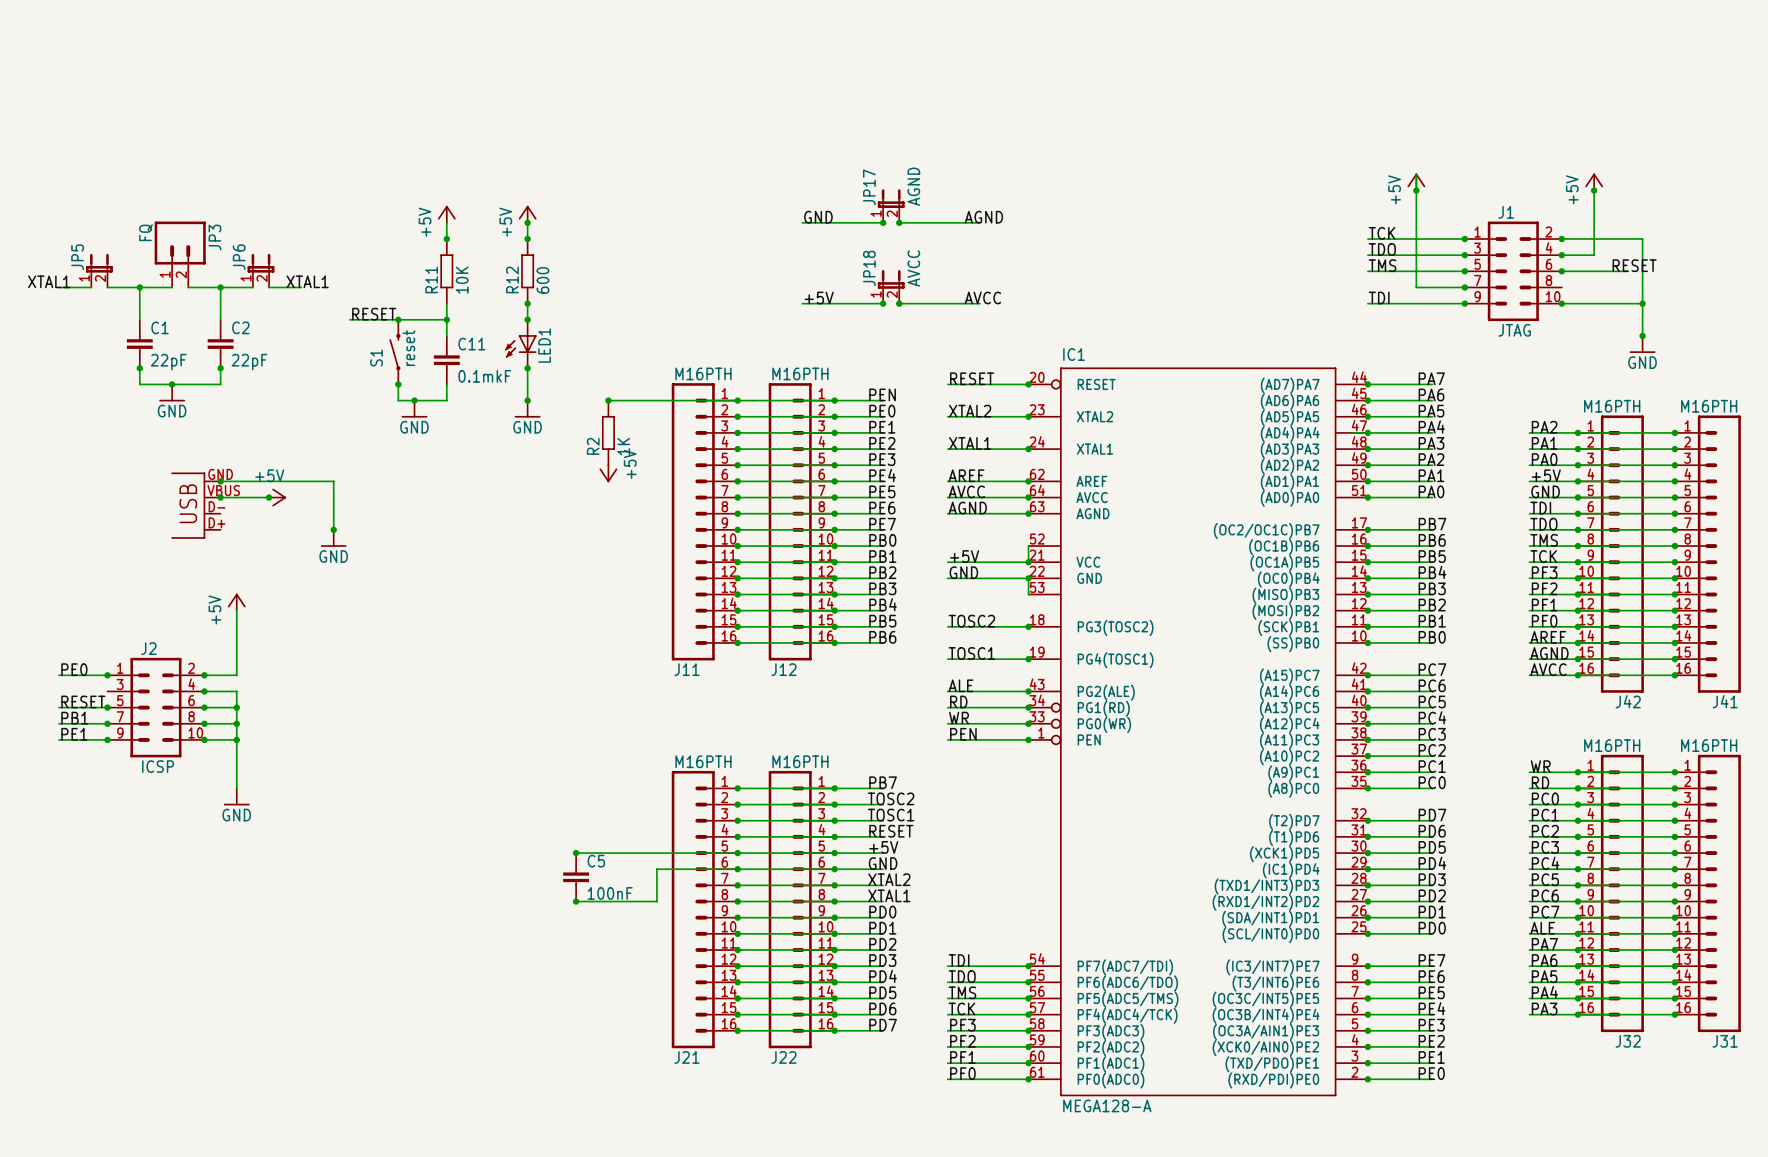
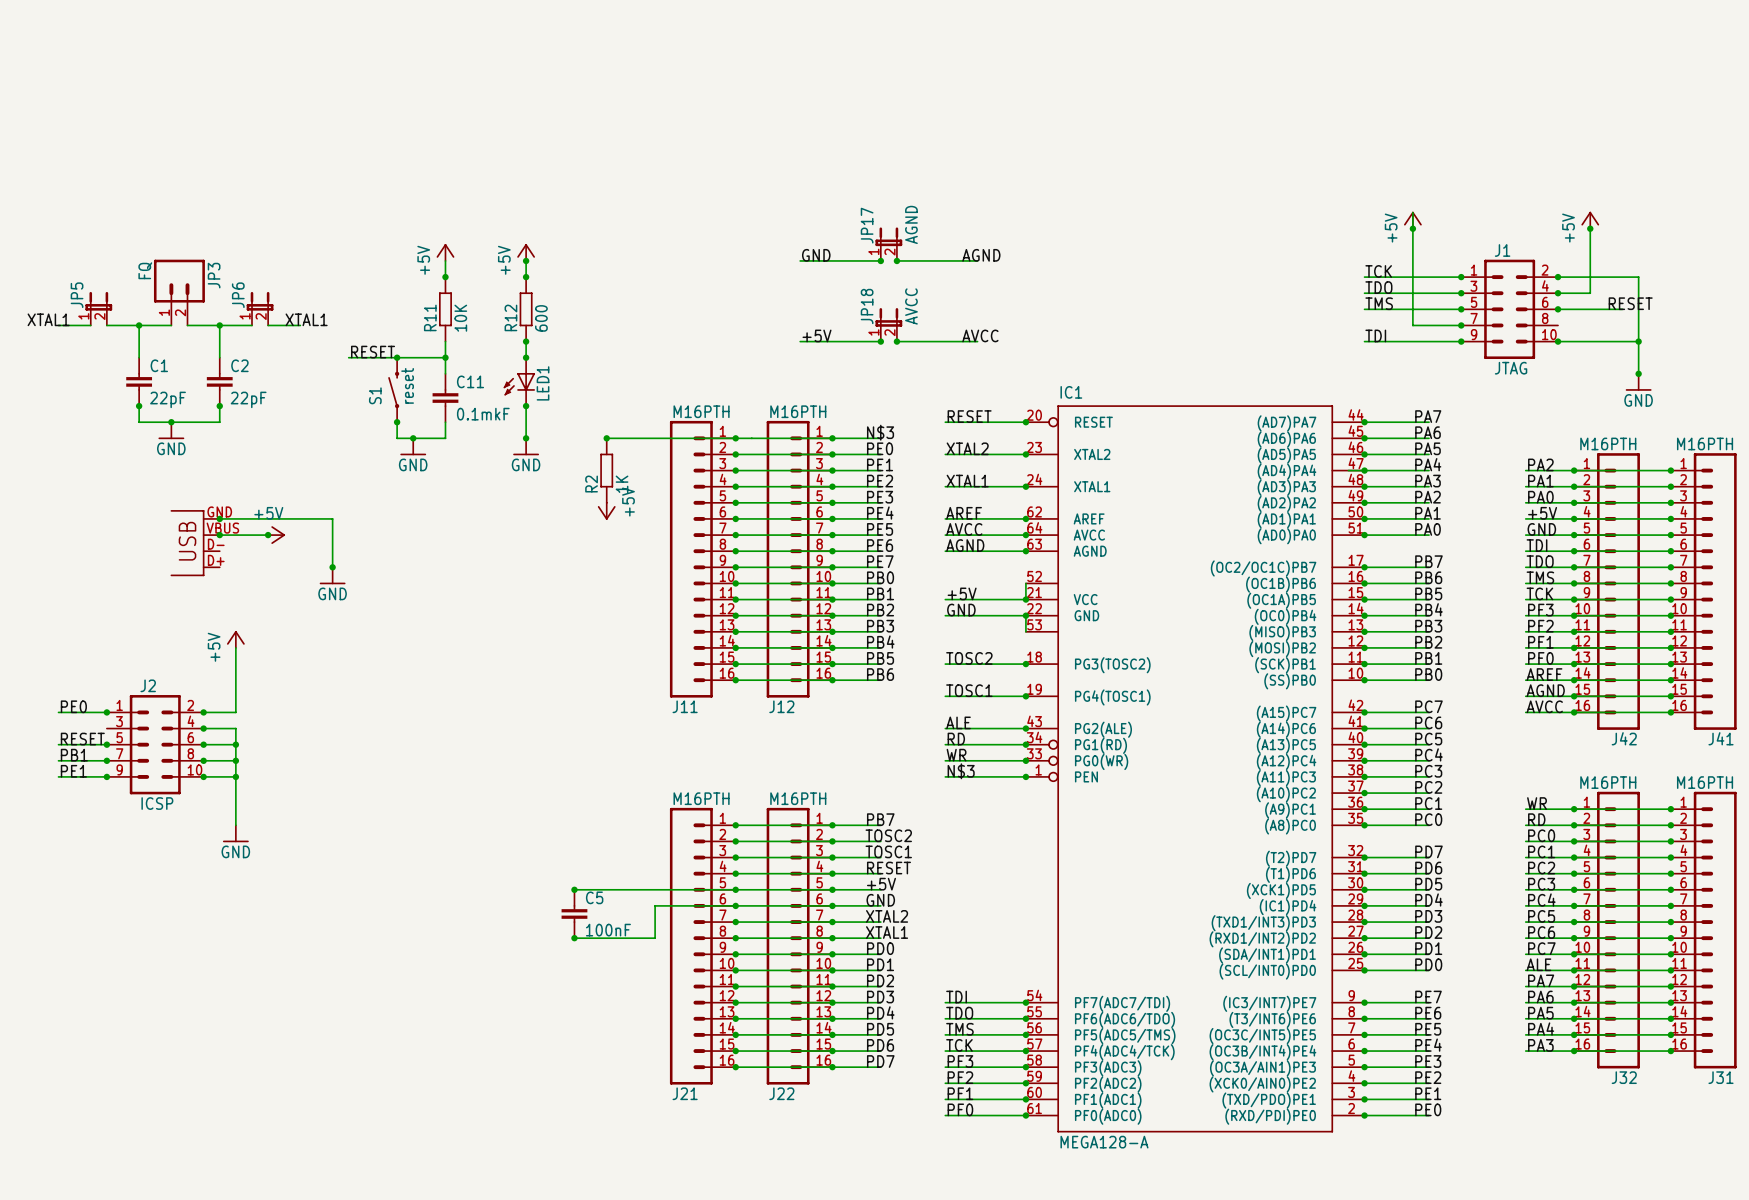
label: PEN (882, 394) -> N$3 (880, 432)
label: PEN (963, 734) -> N$3 (961, 771)

